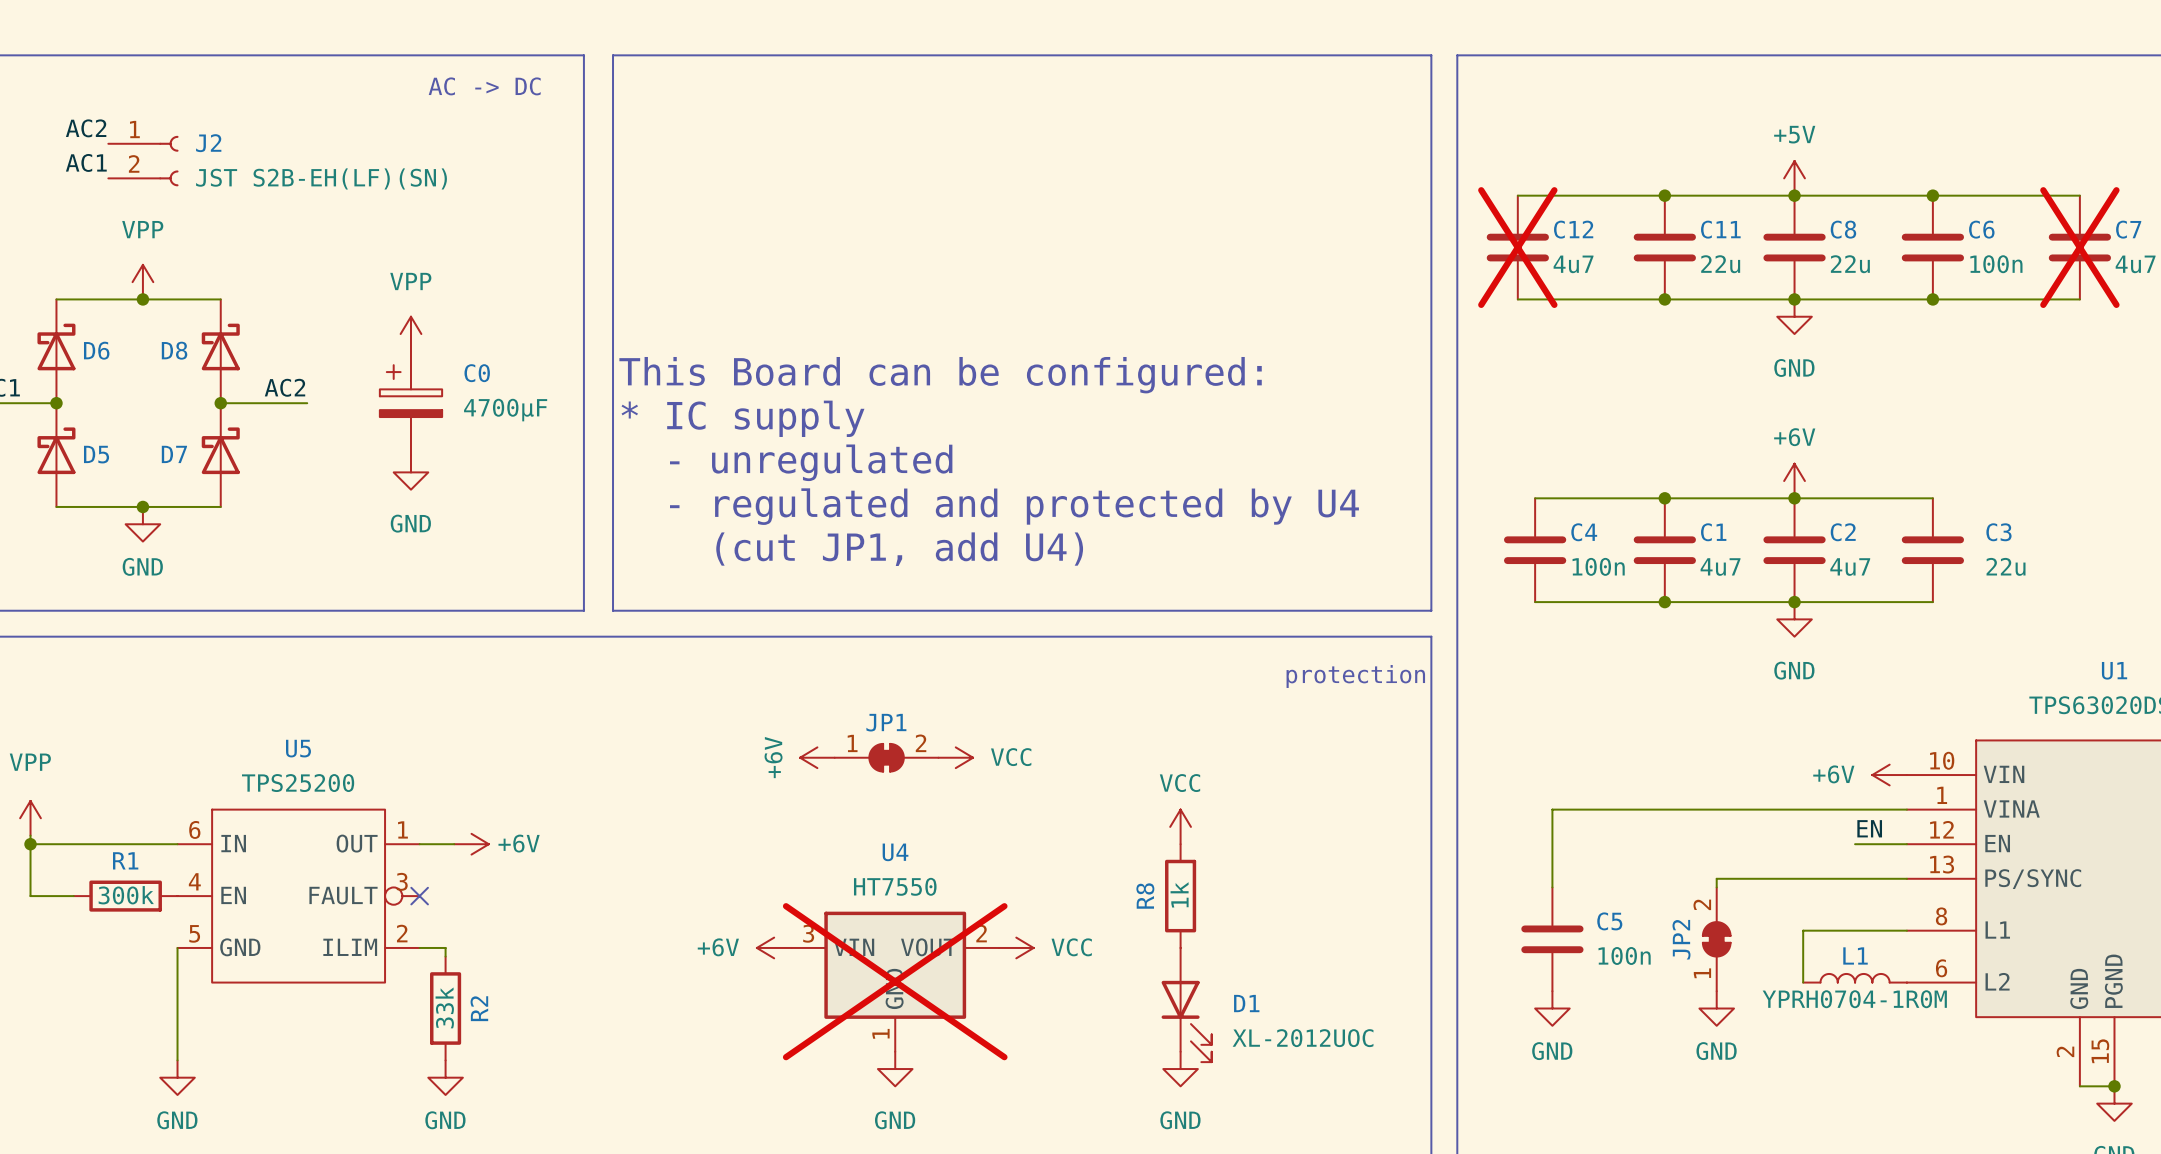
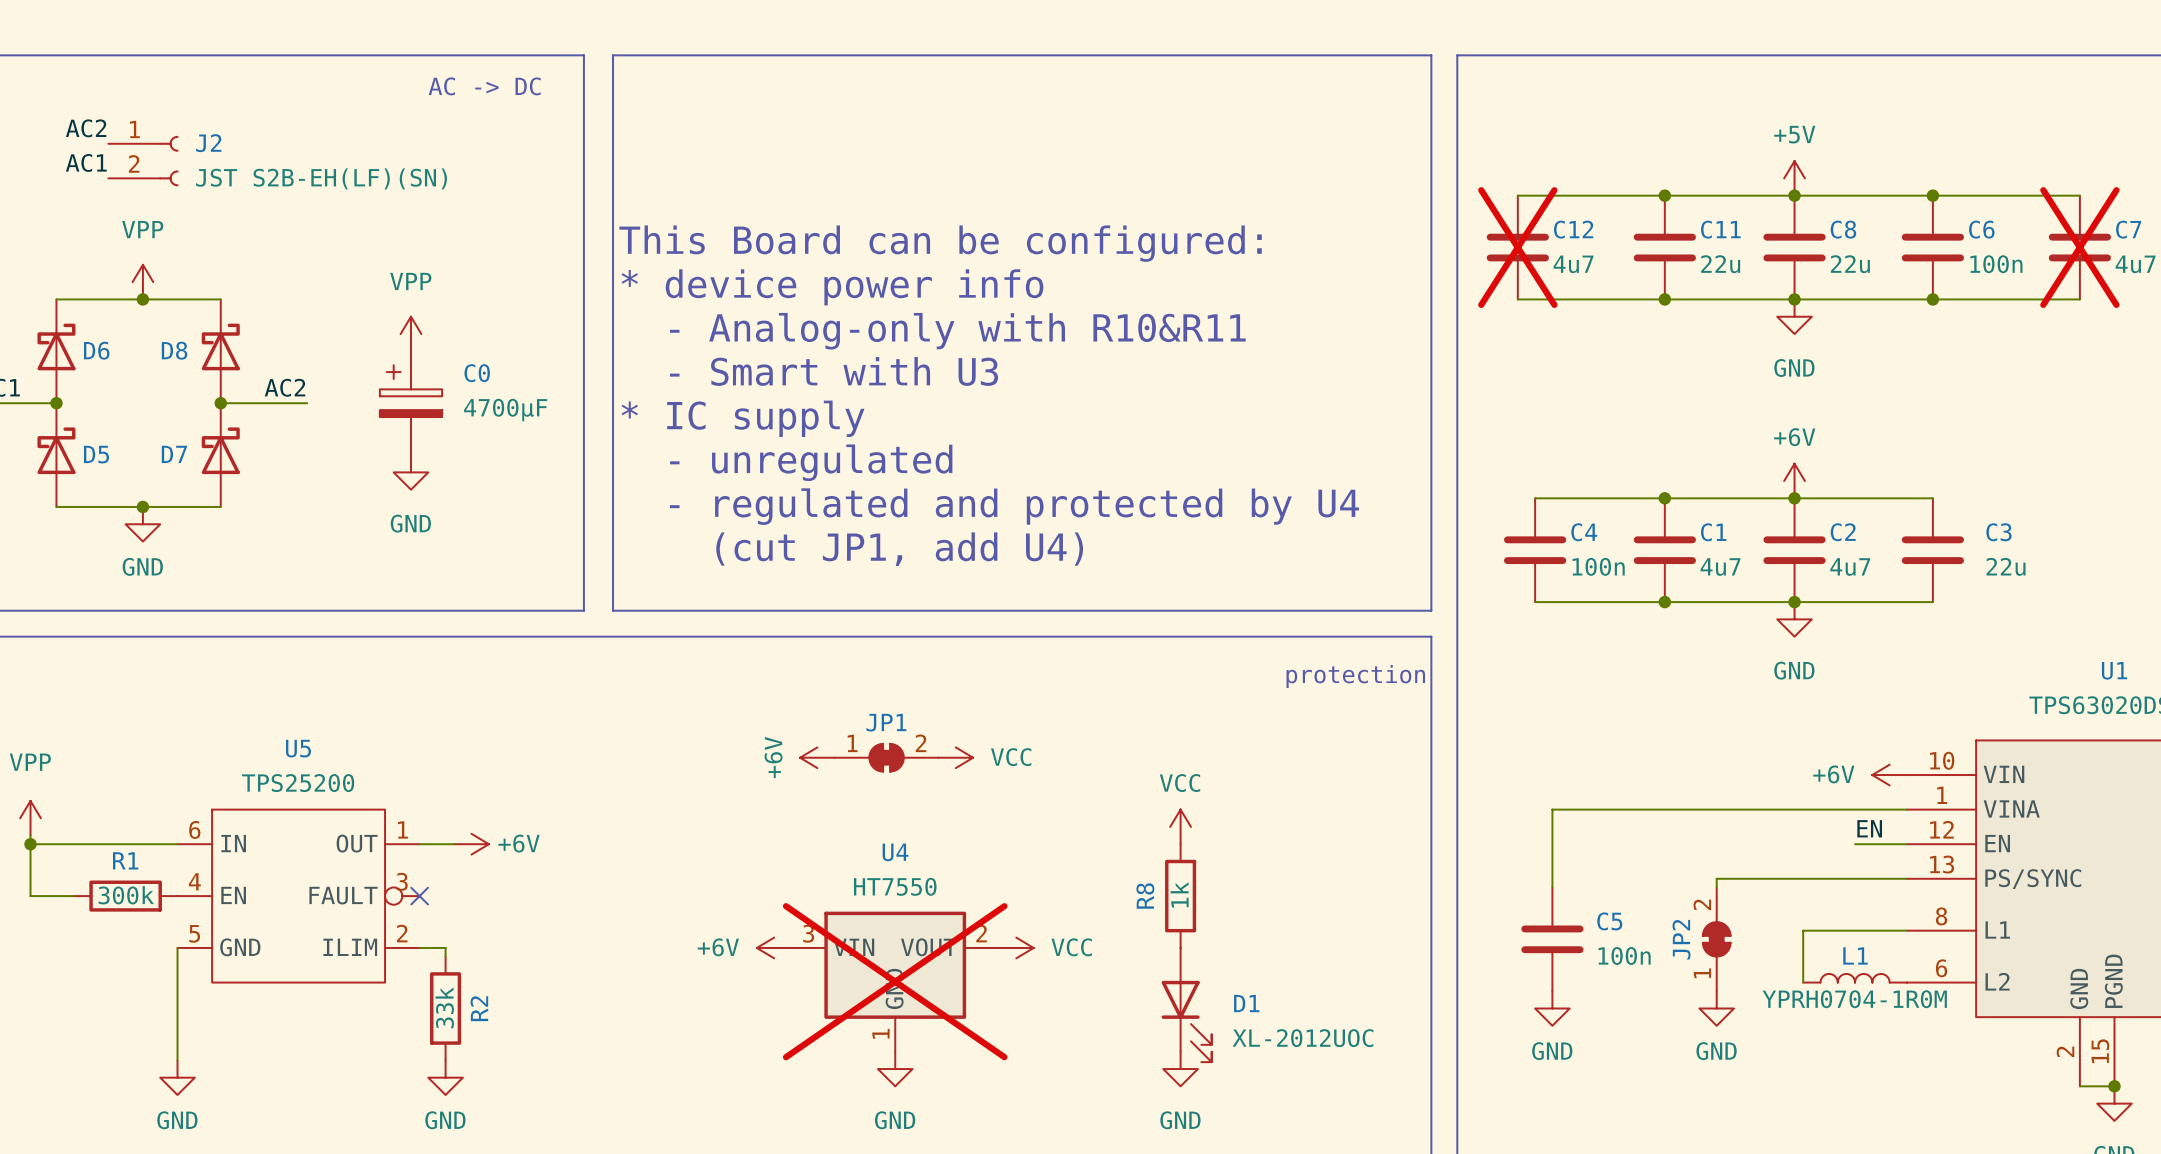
text: none -> This Board can be configured: (940, 243)
text: none -> * device power info (832, 287)
text: none -> - Analog-only with R10&R11 (957, 331)
text: This Board can be configured: (940, 375) -> - Smart with U3 (834, 371)

